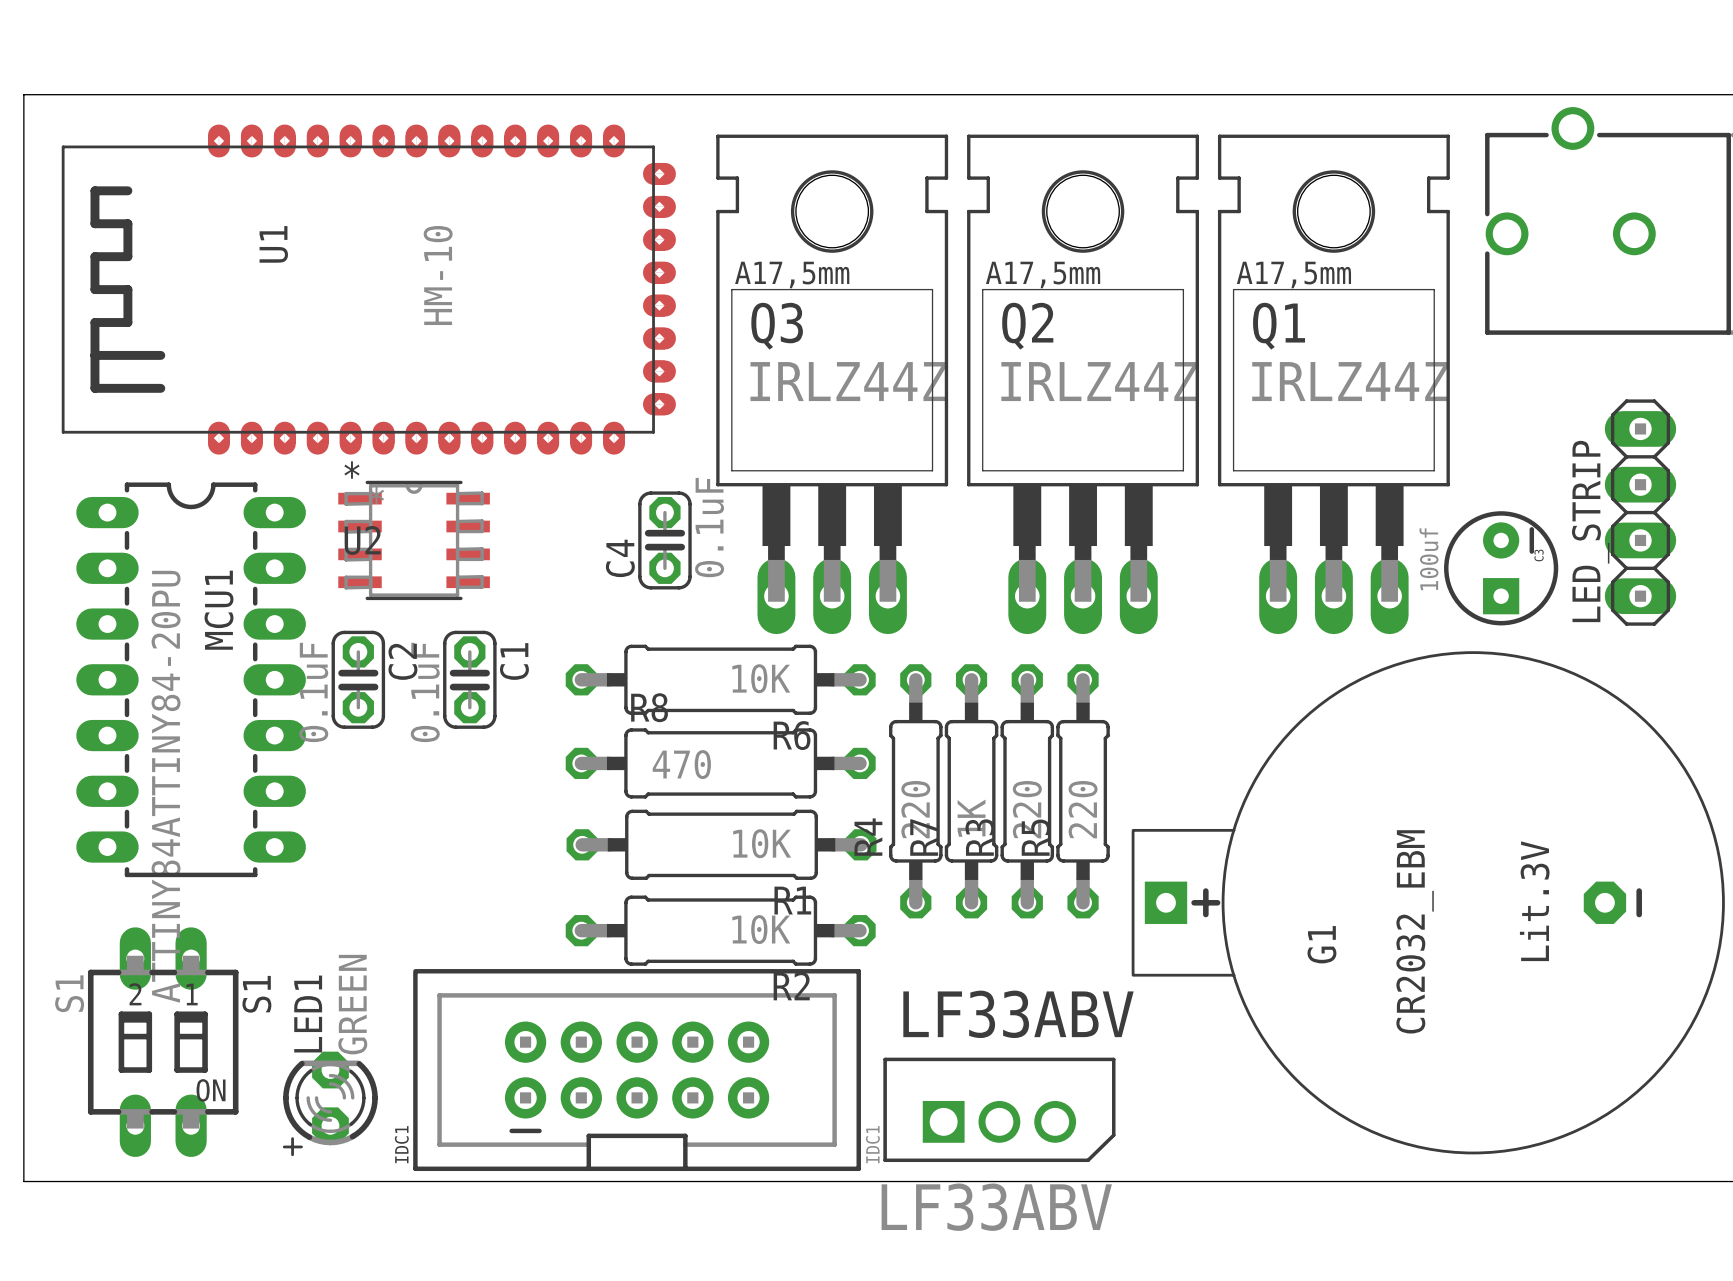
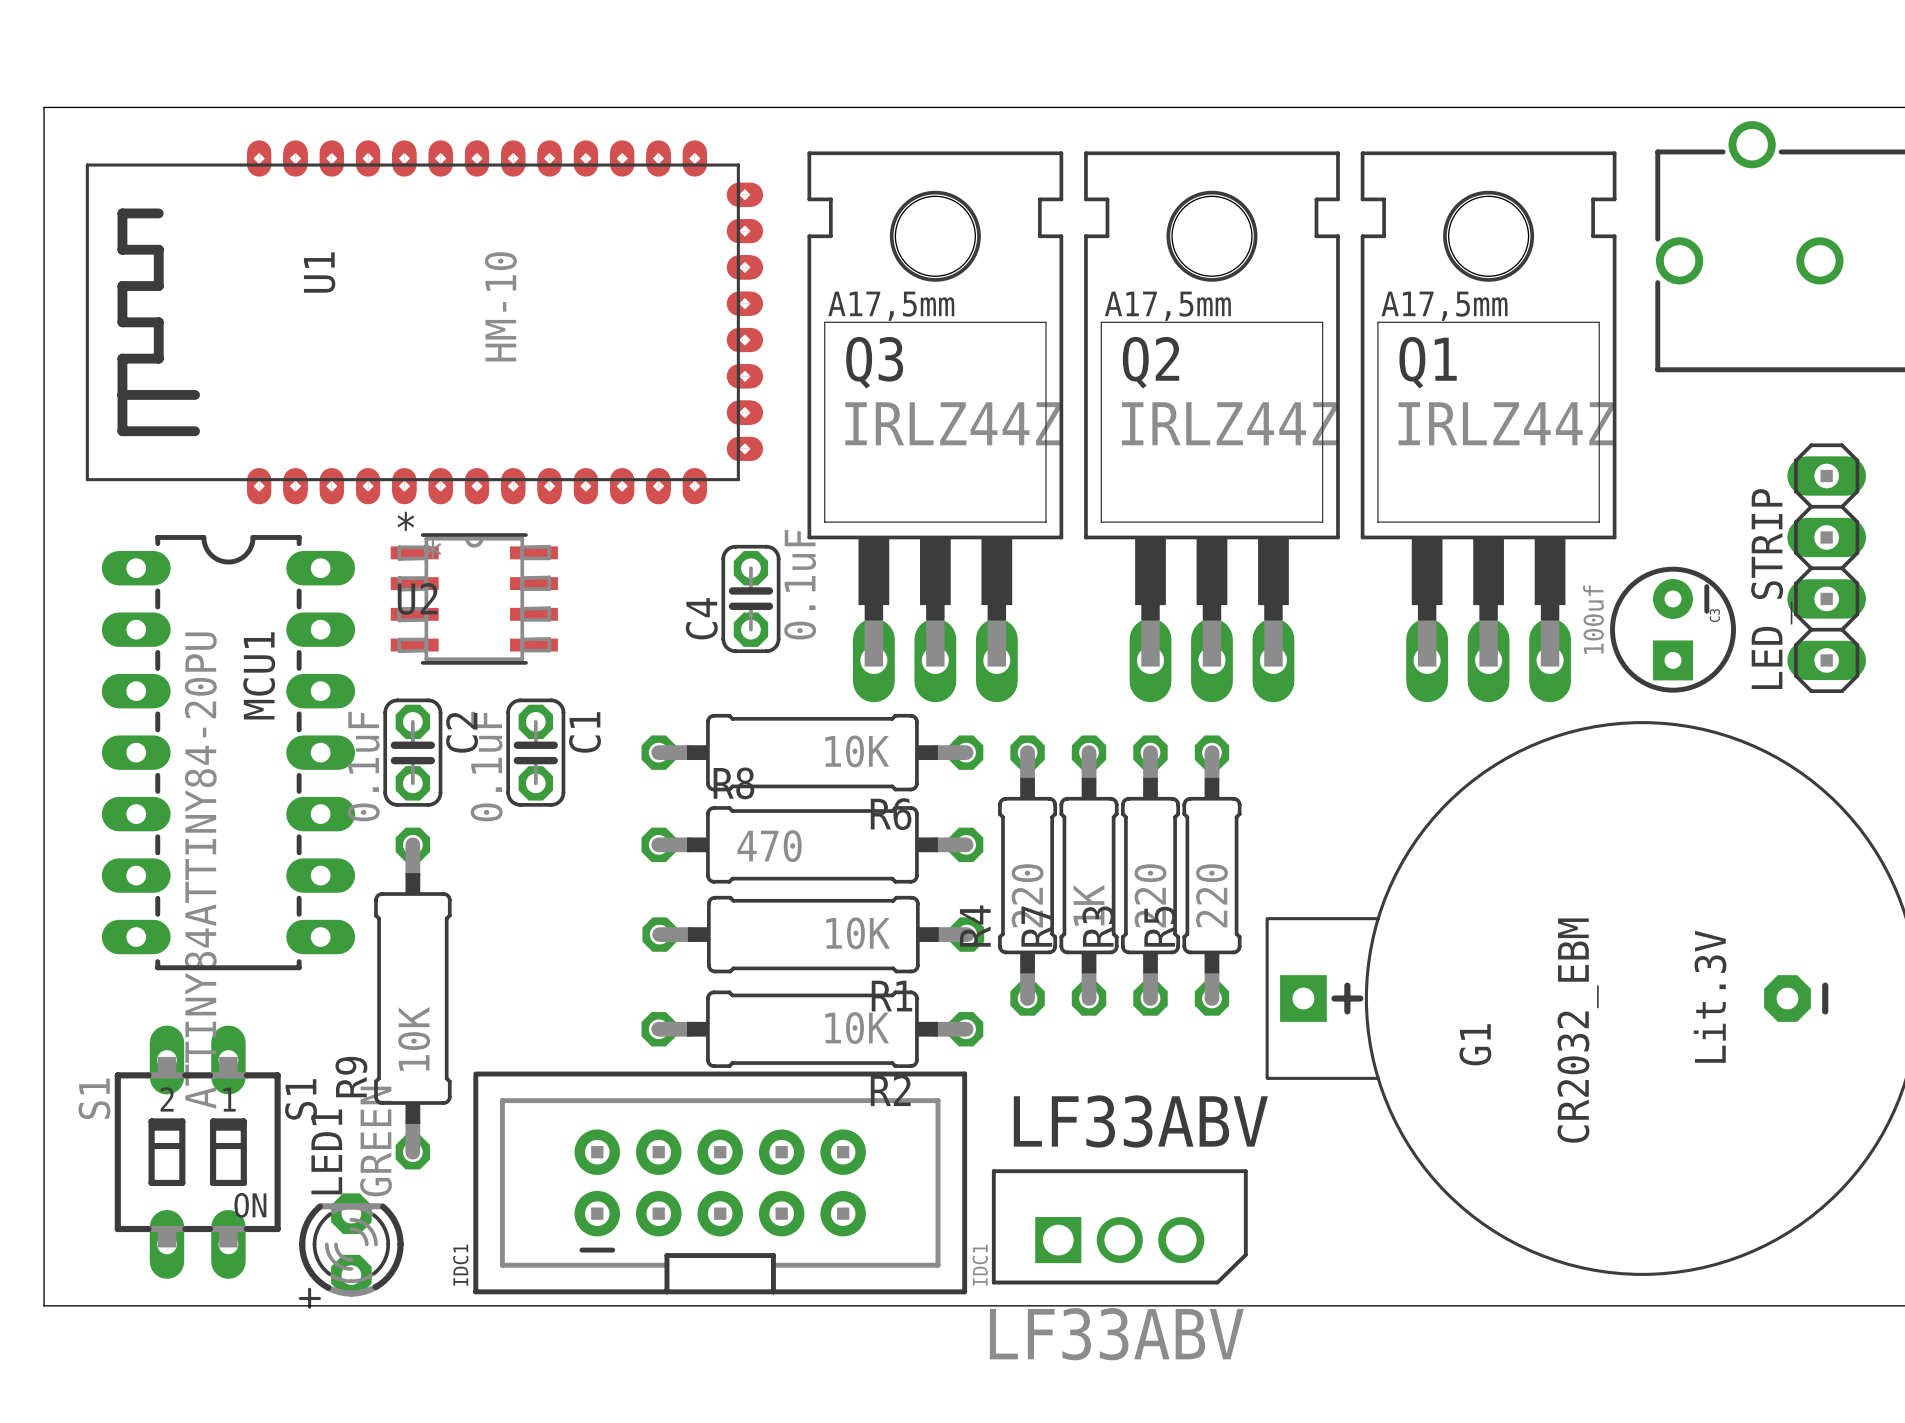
R9: none -> 10K (412, 998)
LED1 position: (330, 1103) -> (351, 1251)

